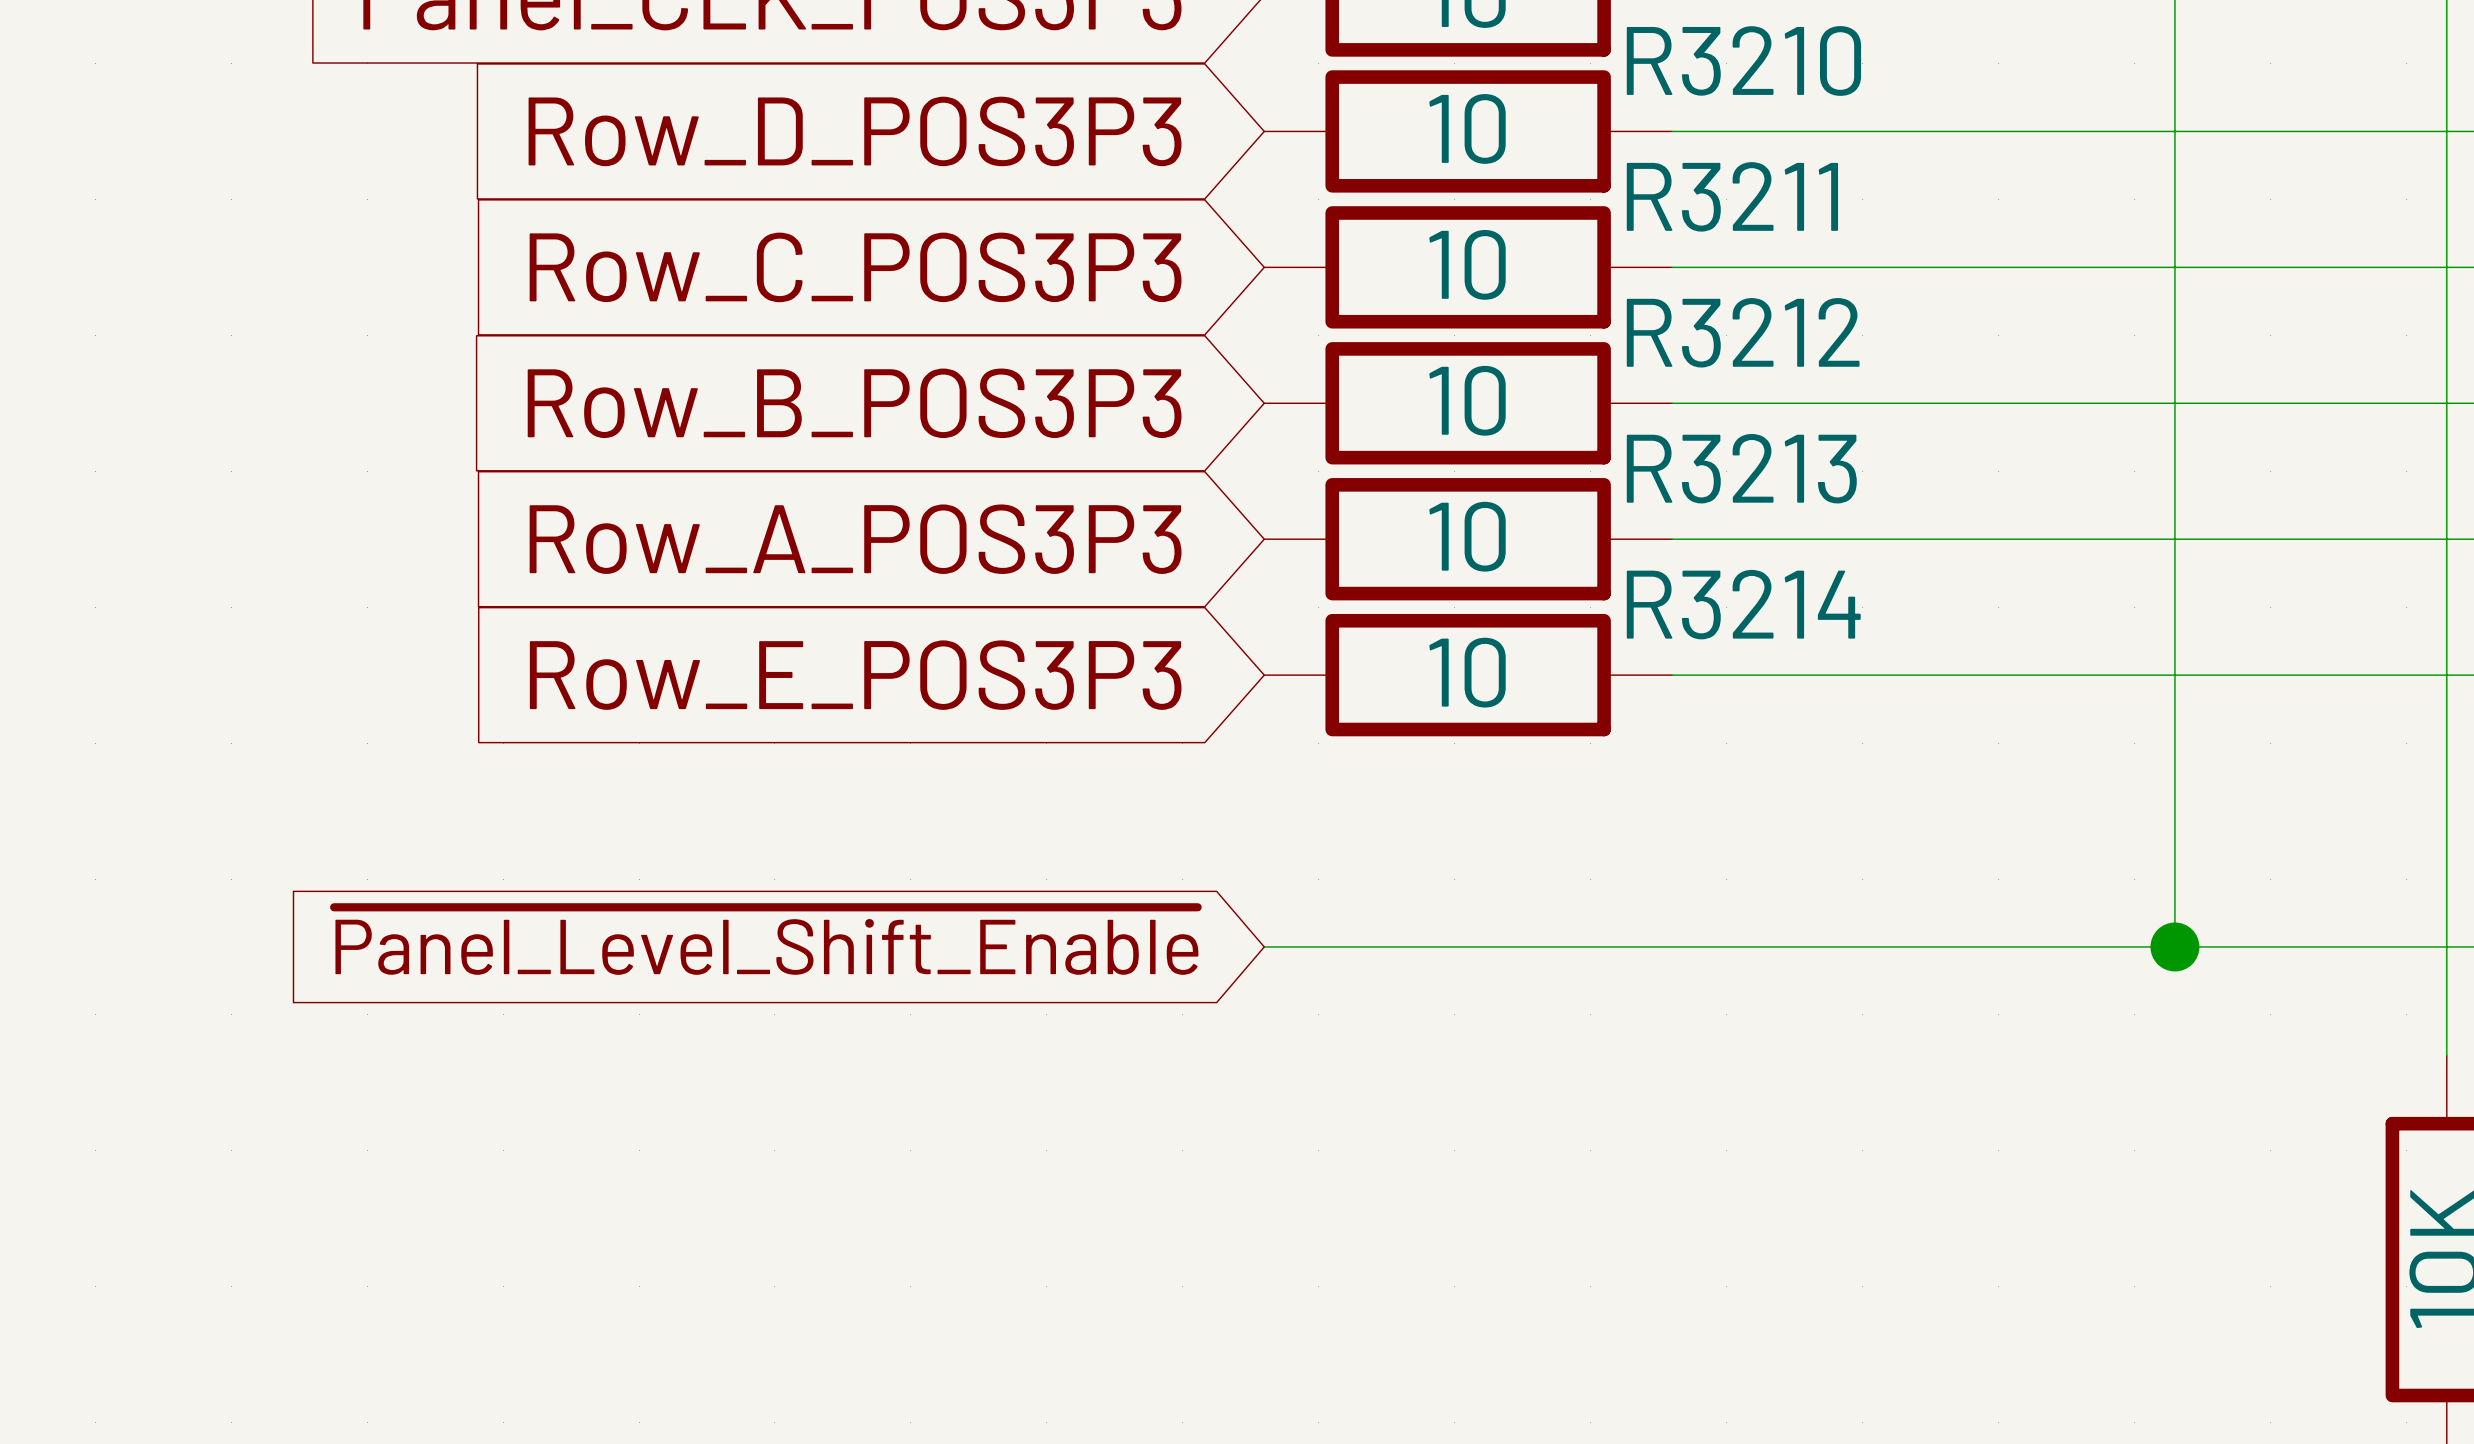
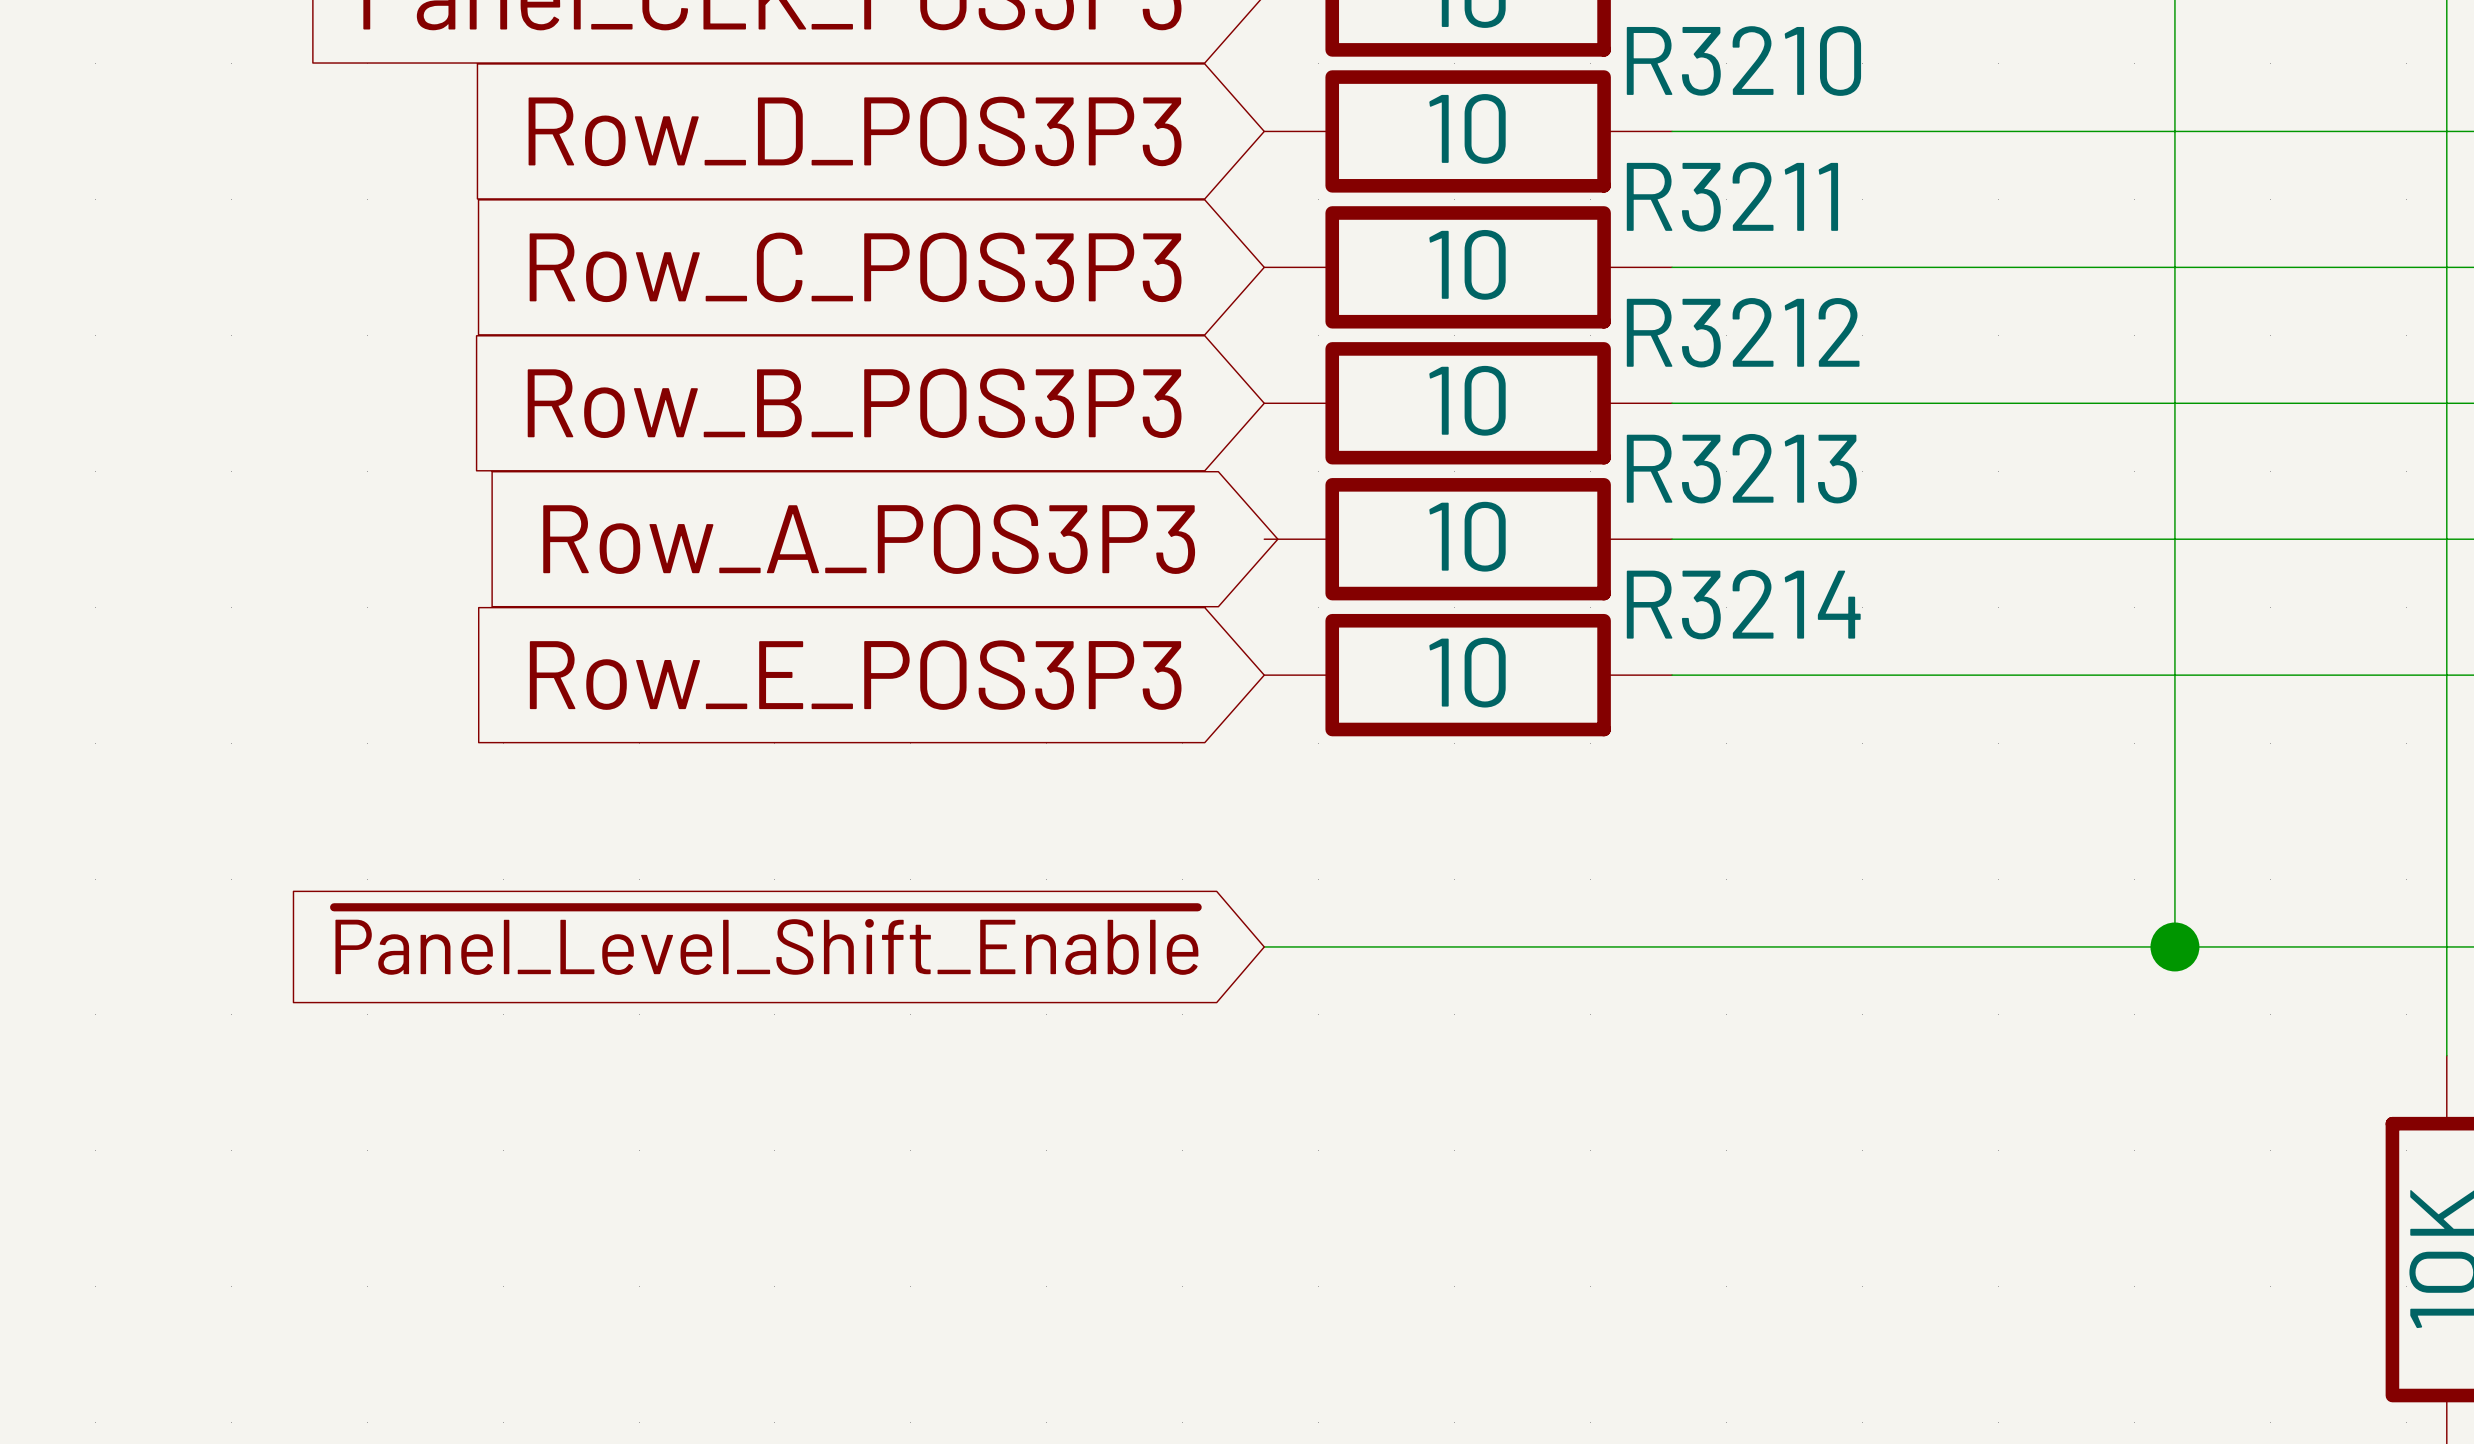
global label position: Row_A_POS3P3 (855, 539) -> Row_A_POS3P3 (869, 539)

